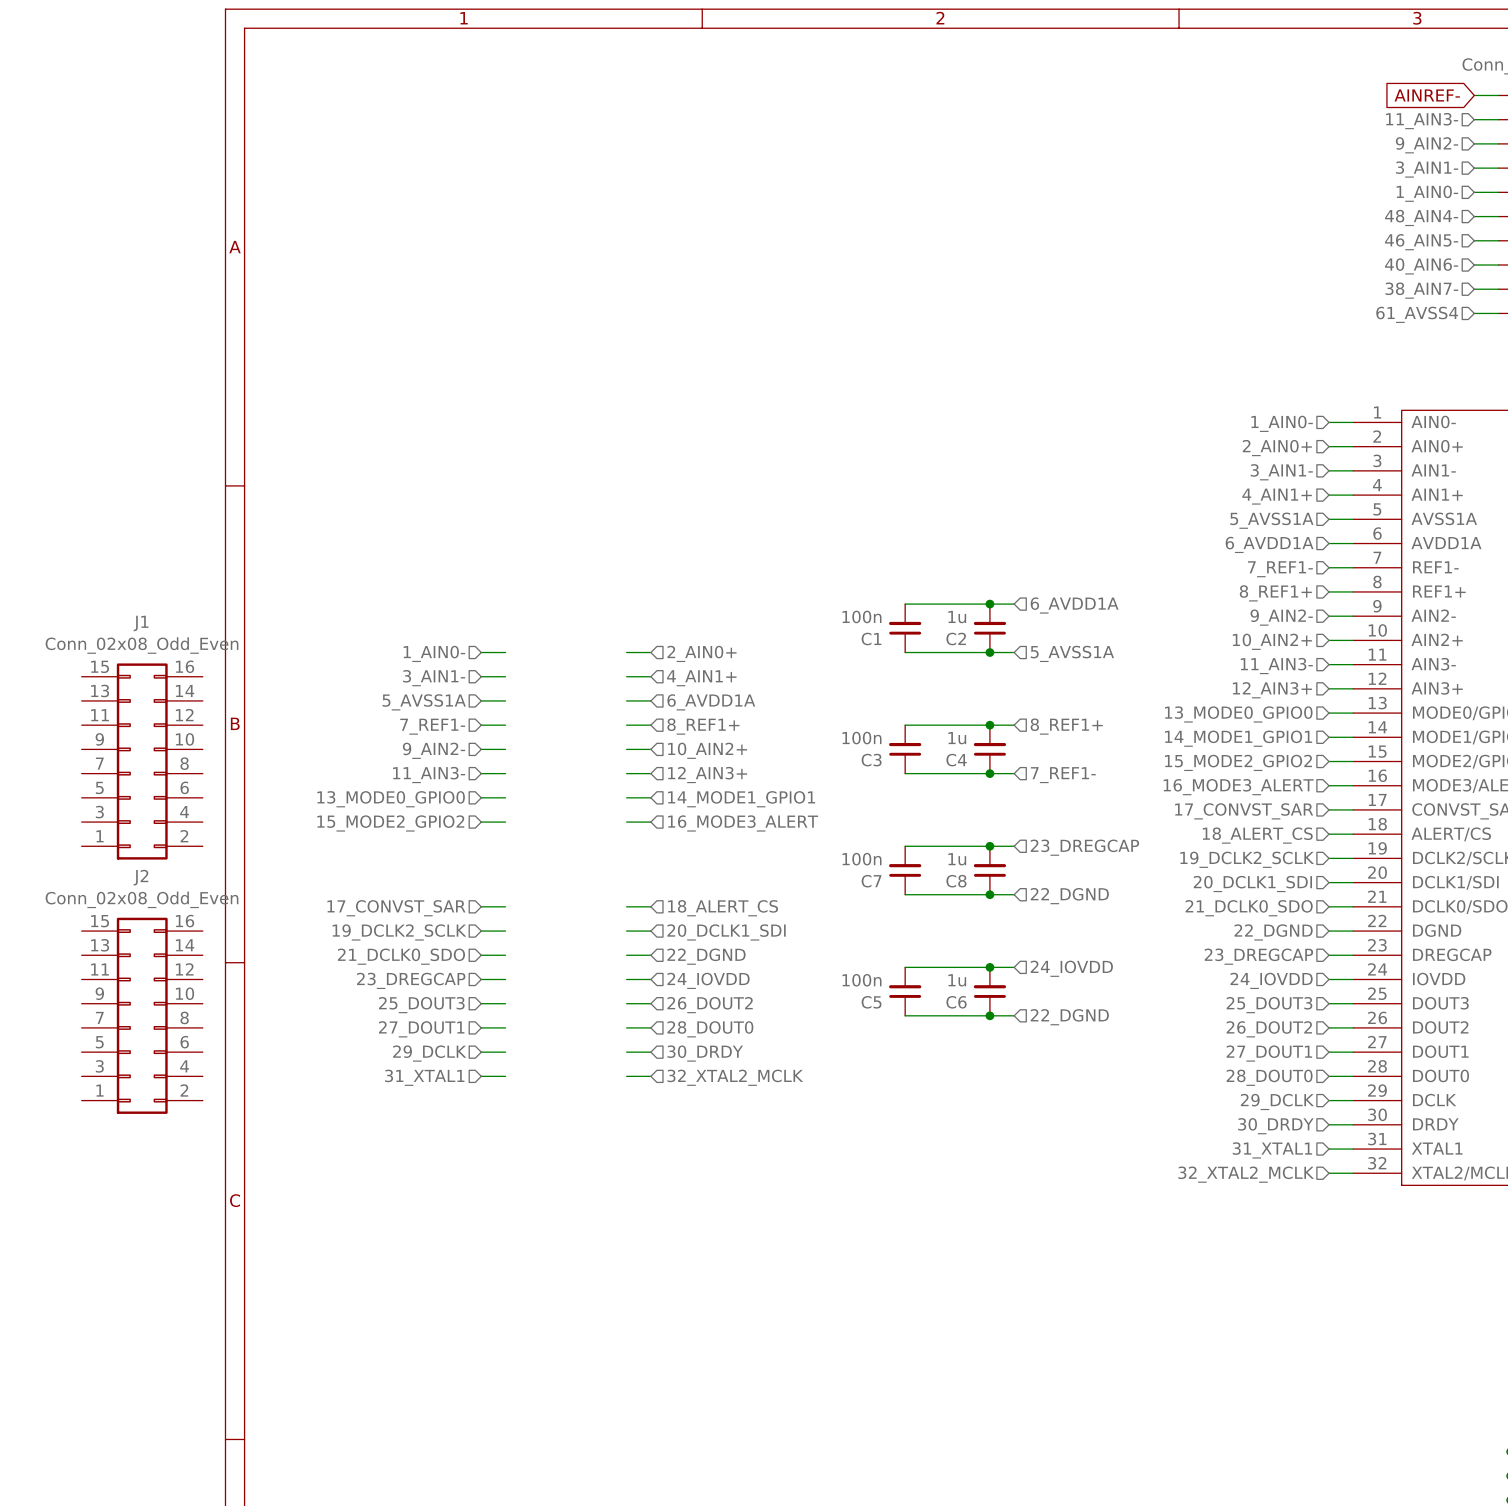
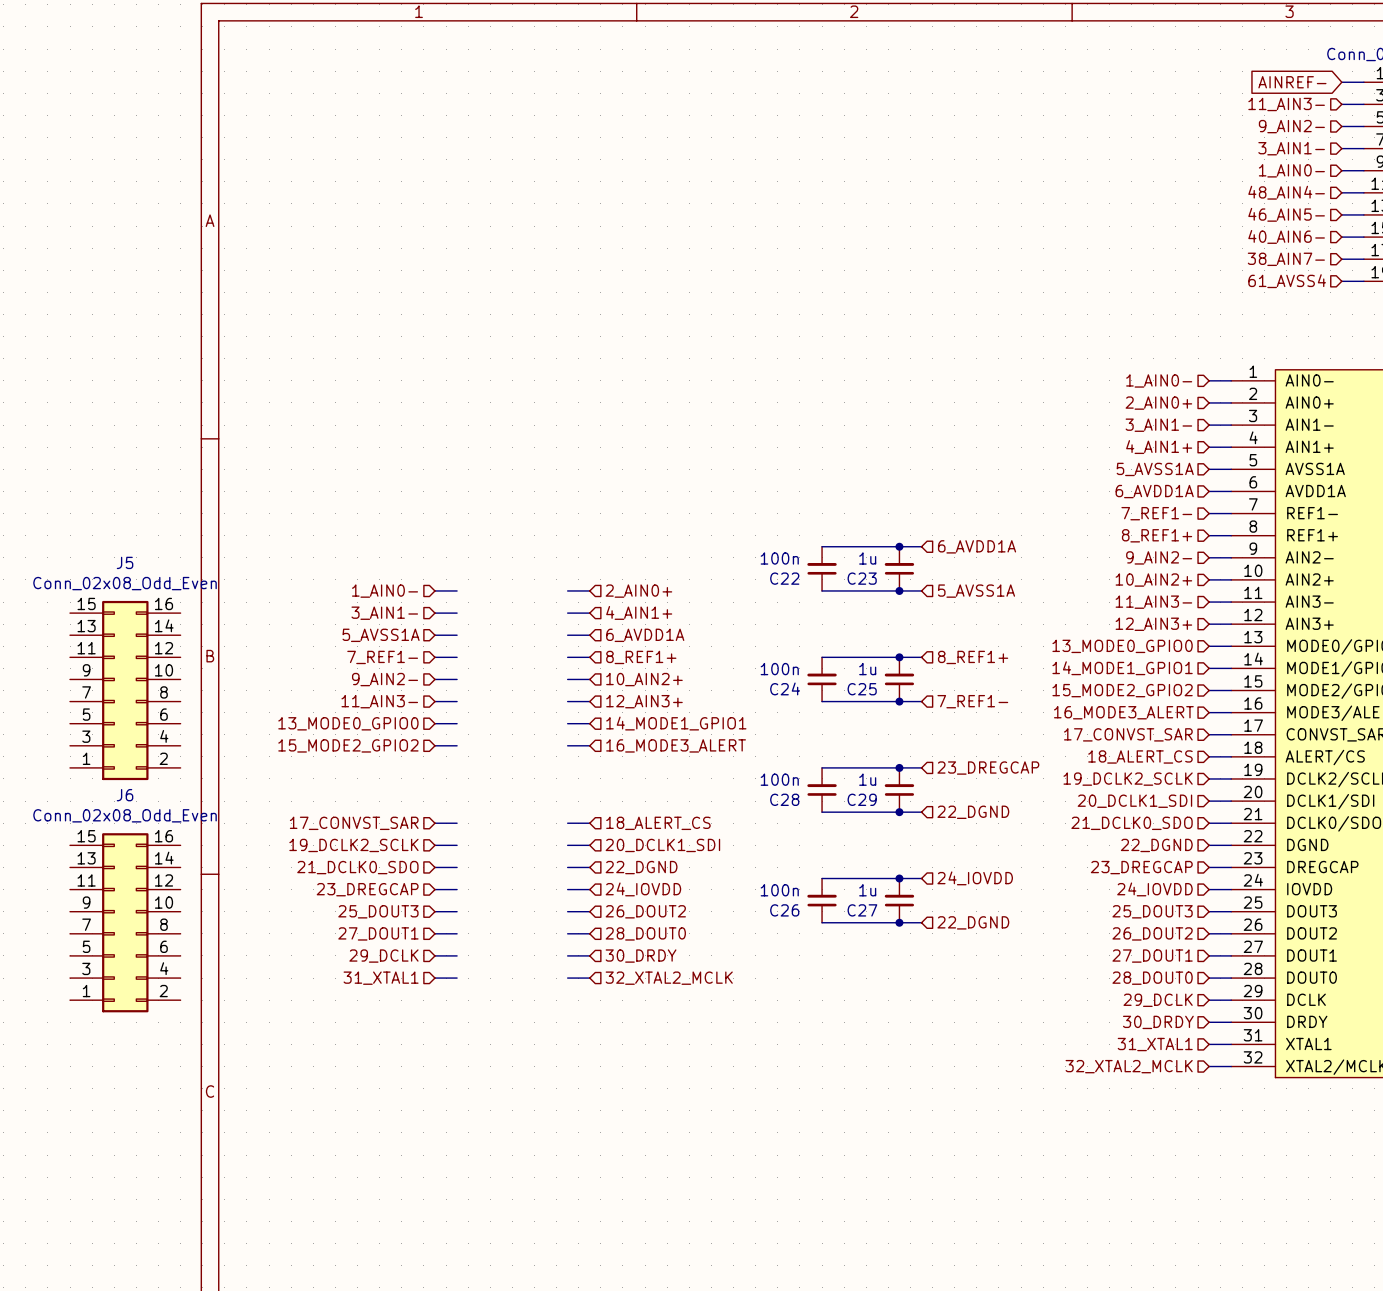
J1 name: J1 (141, 623) -> J5 (125, 562)
C1 name: C1 (871, 639) -> C22 (784, 578)
C2 name: C2 (956, 639) -> C23 (862, 578)
C3 name: C3 (871, 760) -> C24 (785, 688)
C4 name: C4 (956, 760) -> C25 (862, 689)
J2 name: J2 (140, 877) -> J6 (125, 795)
C7 name: C7 (871, 881) -> C28 (784, 799)
C8 name: C8 (956, 881) -> C29 (862, 799)
C5 name: C5 (871, 1002) -> C26 (784, 910)
C6 name: C6 (956, 1002) -> C27 (862, 910)

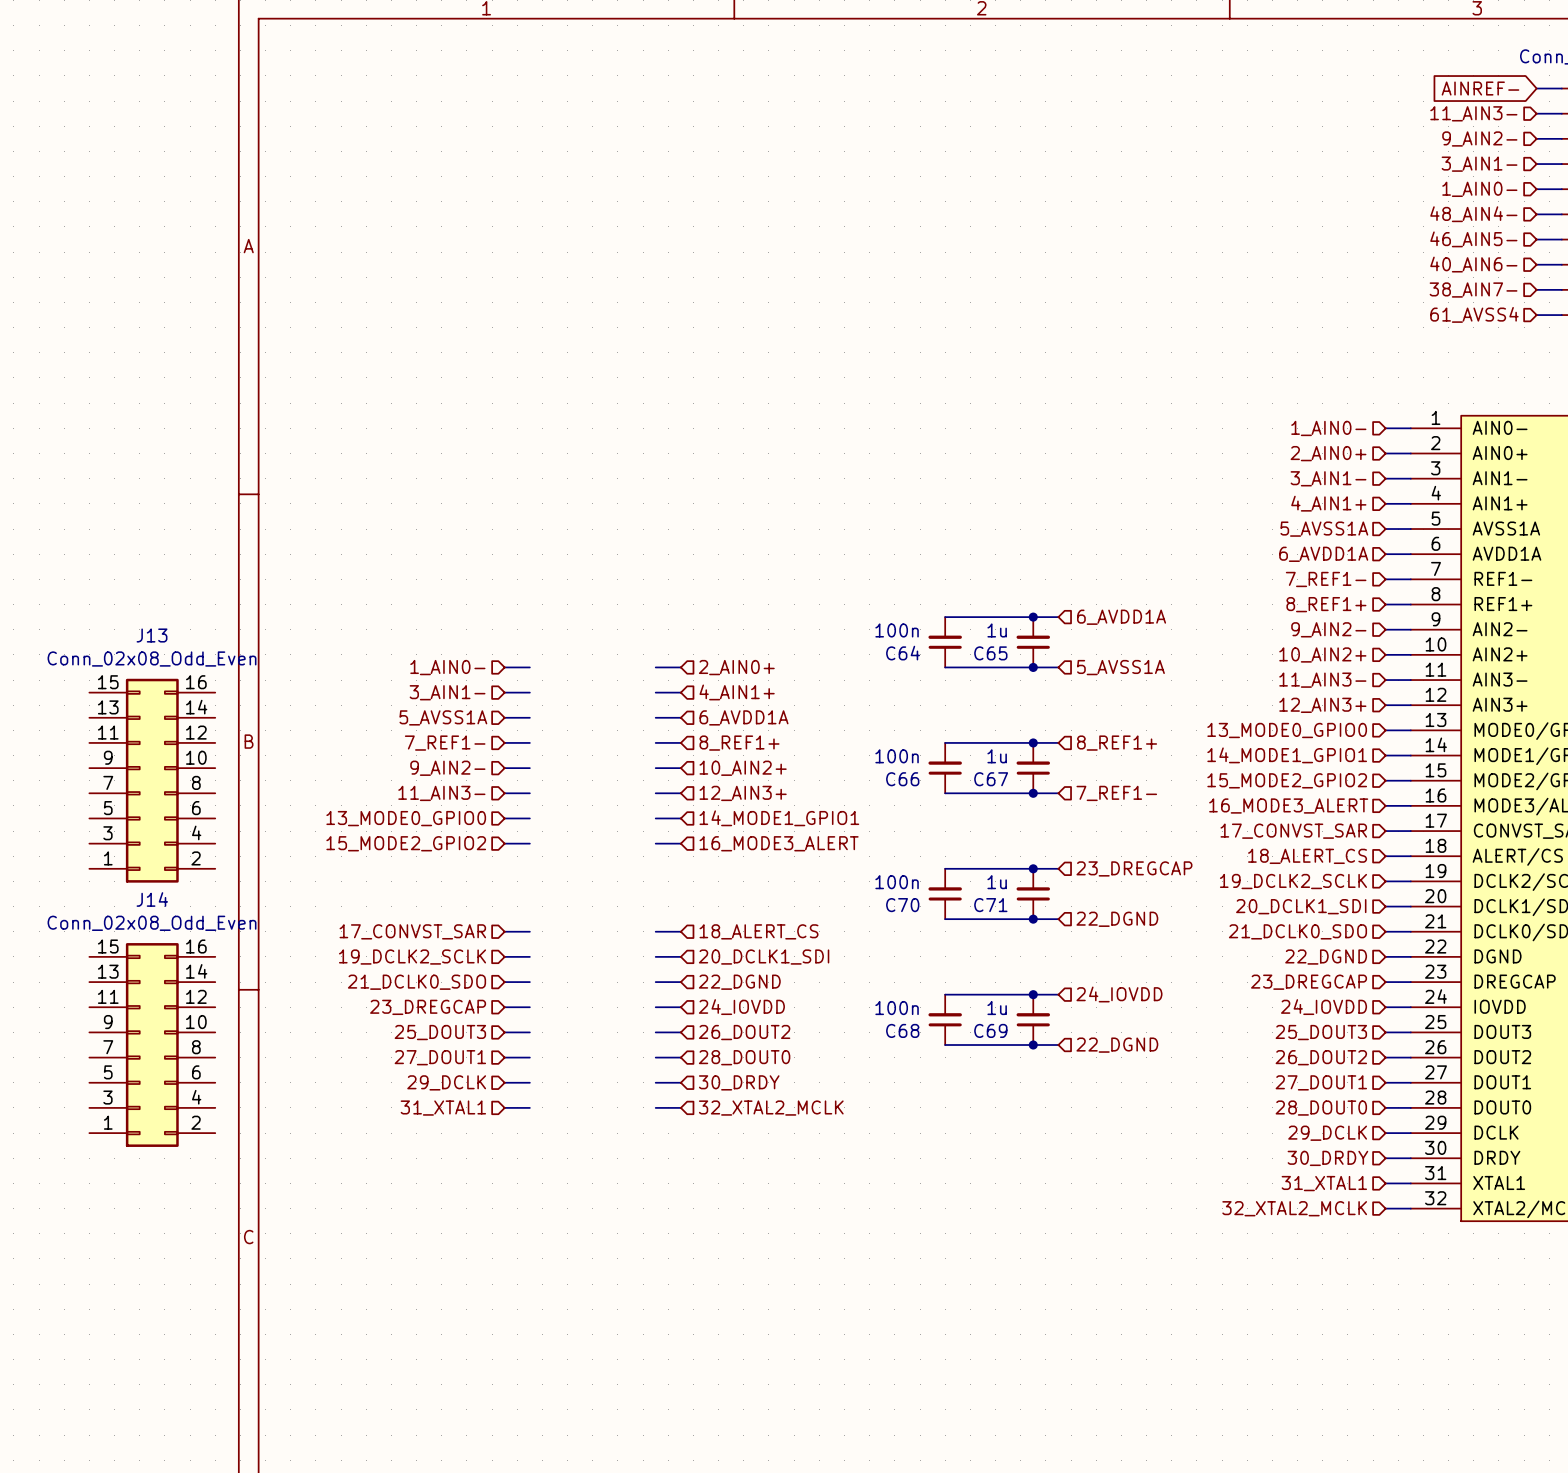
J5 name: J5 (125, 562) -> J13 (152, 635)
C22 name: C22 (784, 578) -> C64 (903, 653)
C23 name: C23 (862, 578) -> C65 (990, 653)
C24 name: C24 (785, 688) -> C66 (902, 779)
C25 name: C25 (862, 689) -> C67 (991, 779)
J6 name: J6 (125, 795) -> J14 (152, 899)
C28 name: C28 (784, 799) -> C70 (902, 905)
C29 name: C29 (862, 799) -> C71 (990, 905)
C26 name: C26 (784, 910) -> C68 (902, 1030)
C27 name: C27 (862, 910) -> C69 (990, 1030)

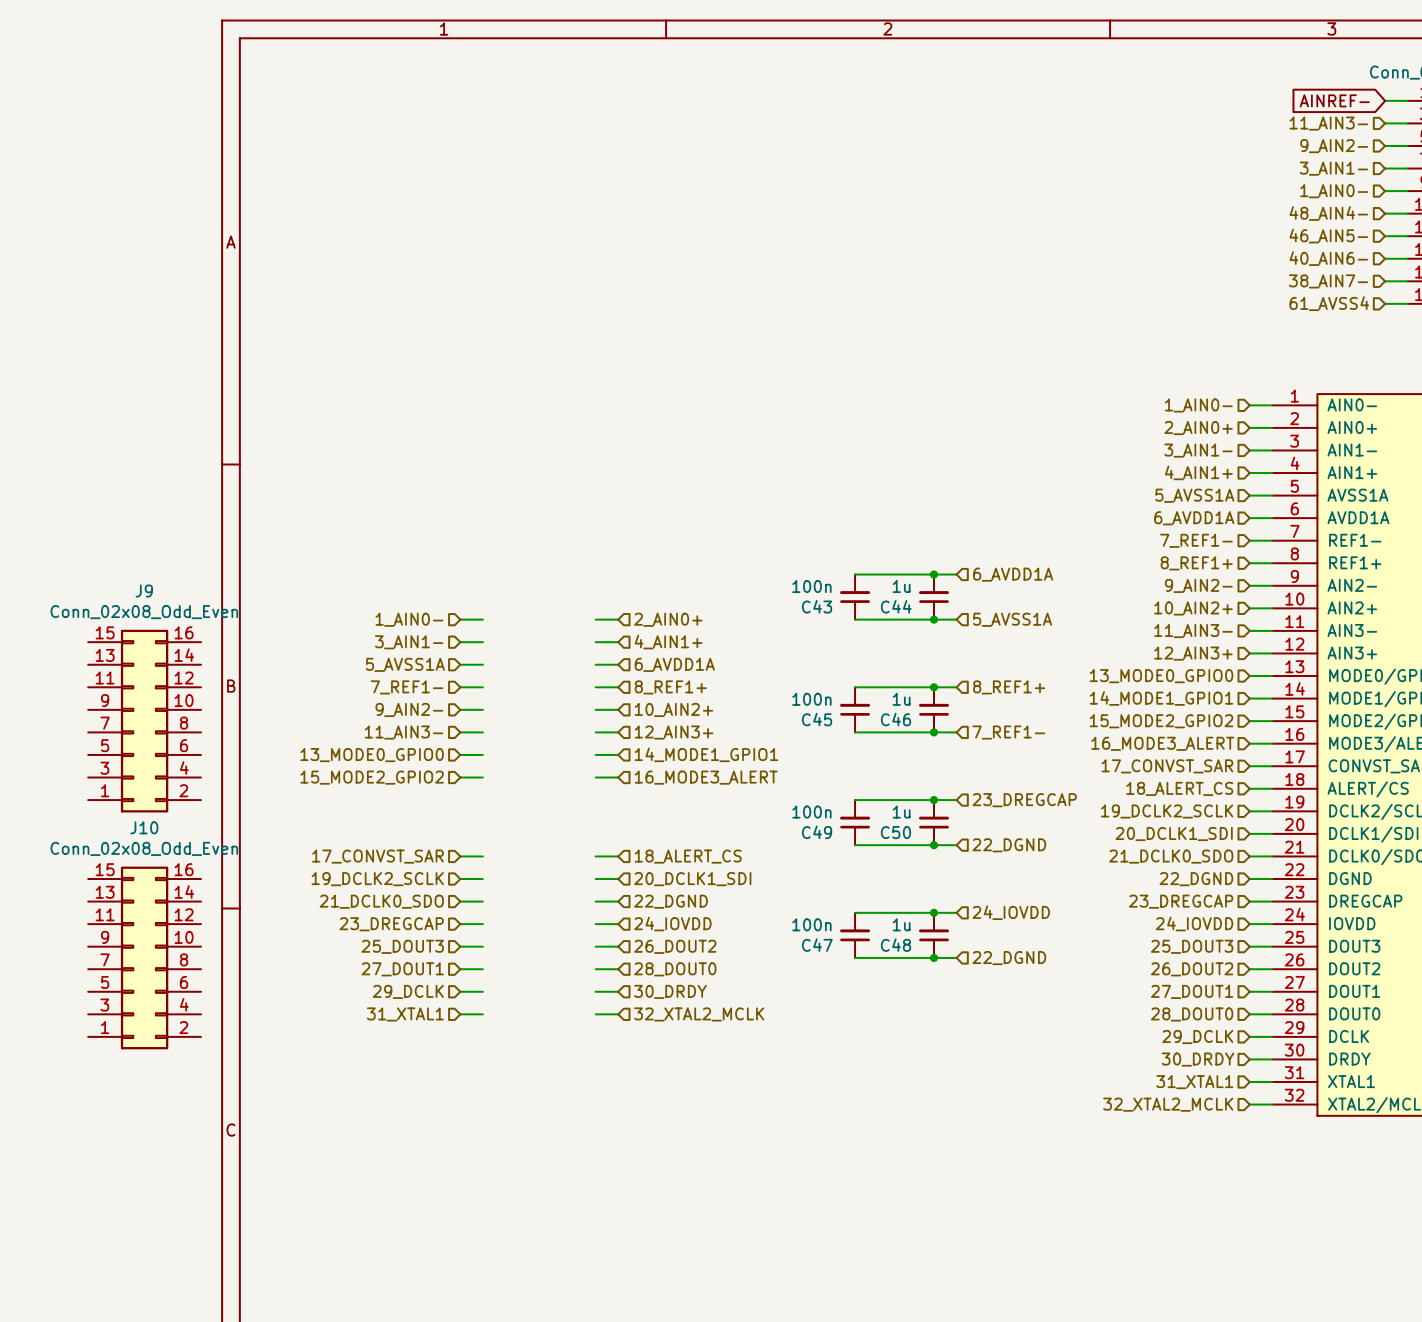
J13 name: J13 (152, 635) -> J9 (144, 591)
C64 name: C64 (903, 653) -> C43 (817, 606)
C65 name: C65 (990, 653) -> C44 (896, 606)
C66 name: C66 (902, 779) -> C45 (817, 719)
C67 name: C67 (991, 779) -> C46 (895, 719)
J14 name: J14 (152, 899) -> J10 (144, 827)
C70 name: C70 (902, 905) -> C49 (817, 832)
C71 name: C71 (990, 905) -> C50 (895, 832)
C68 name: C68 (902, 1030) -> C47 (817, 945)
C69 name: C69 (990, 1030) -> C48 (895, 945)

